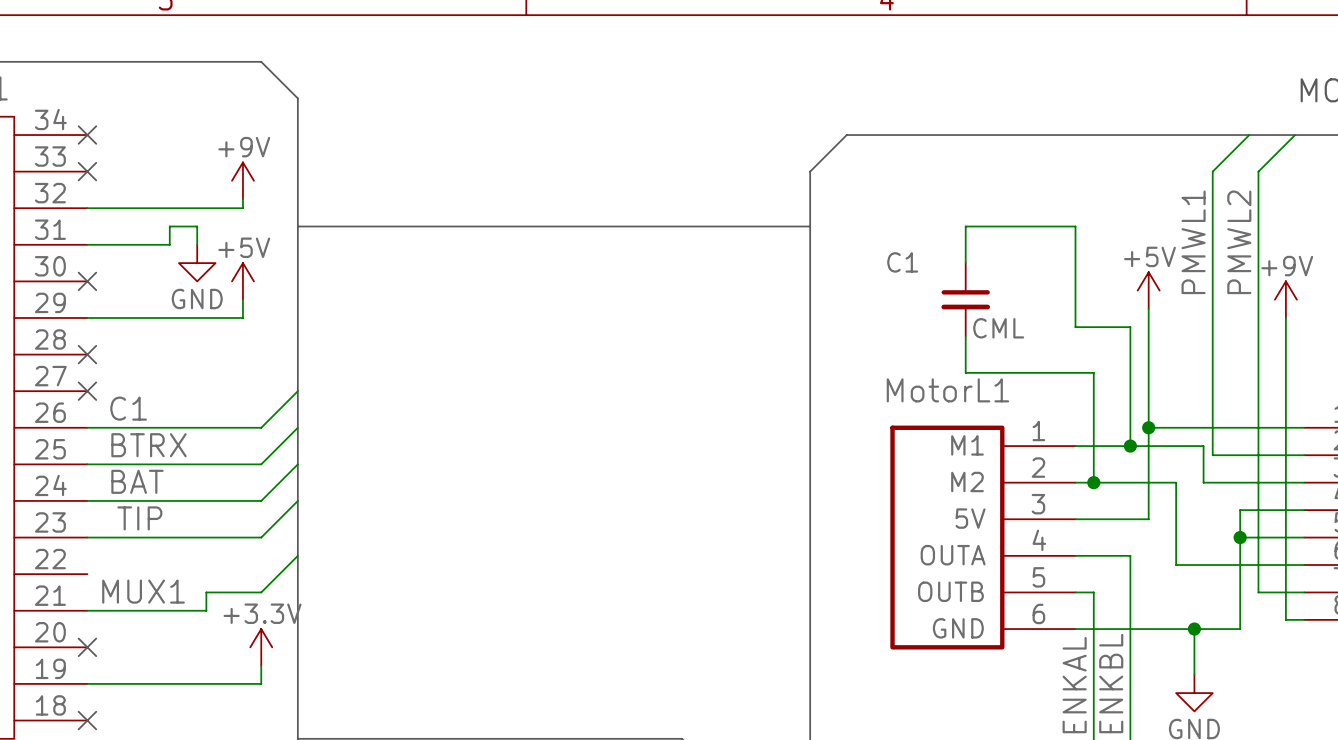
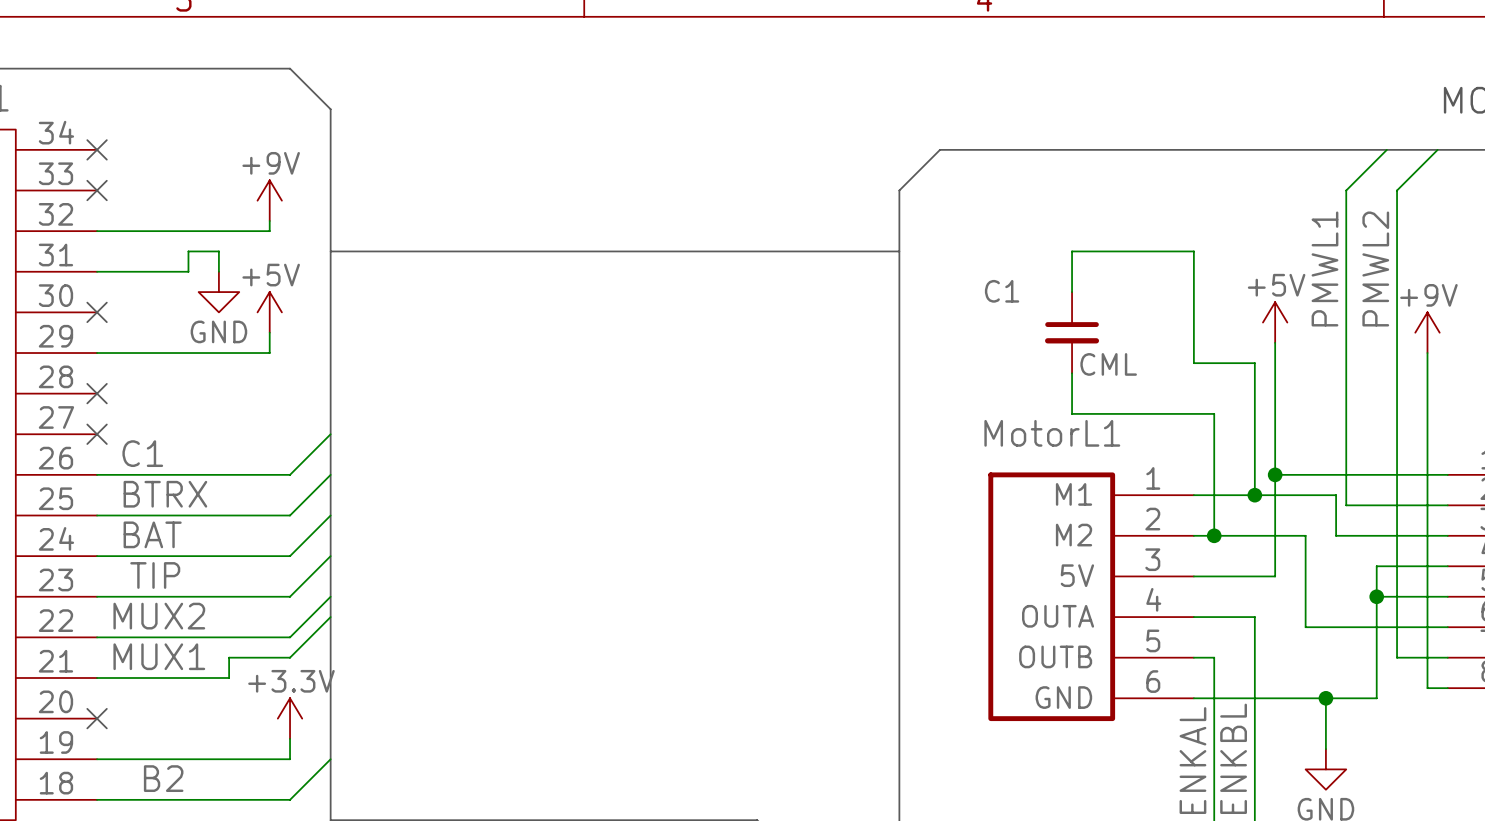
wire: none -> (330, 596) (290, 637) (97, 637)
label: none -> MUX2 (159, 616)
wire: none -> (330, 759) (290, 799) (97, 799)
label: none -> B2 (163, 778)
no-connect mark: (87, 720) -> none

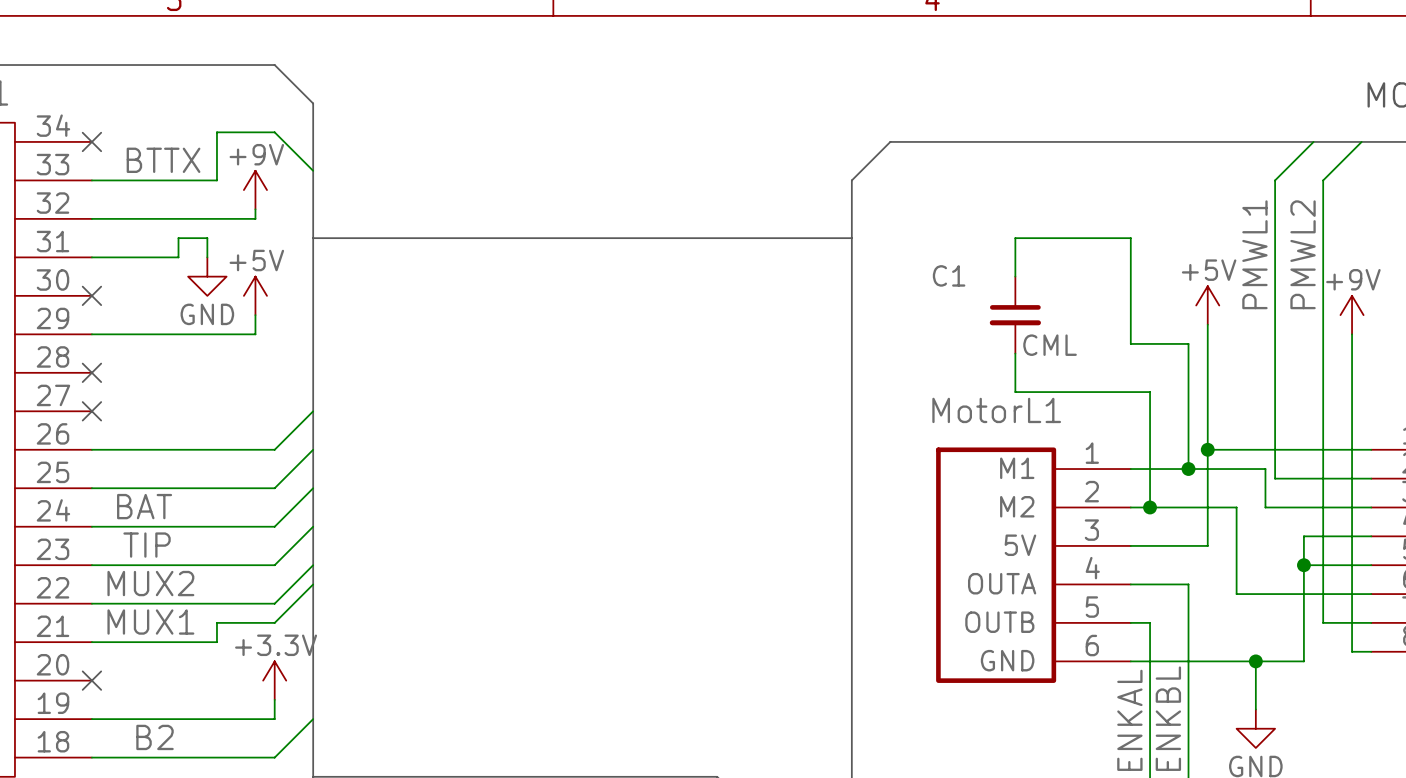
label: none -> BTTX (163, 160)
wire: none -> (313, 170) (274, 132) (216, 132) (216, 180) (91, 180)
no-connect mark: (97, 190) -> none
label: C1 (142, 453) -> none
label: BTRX (165, 494) -> none

